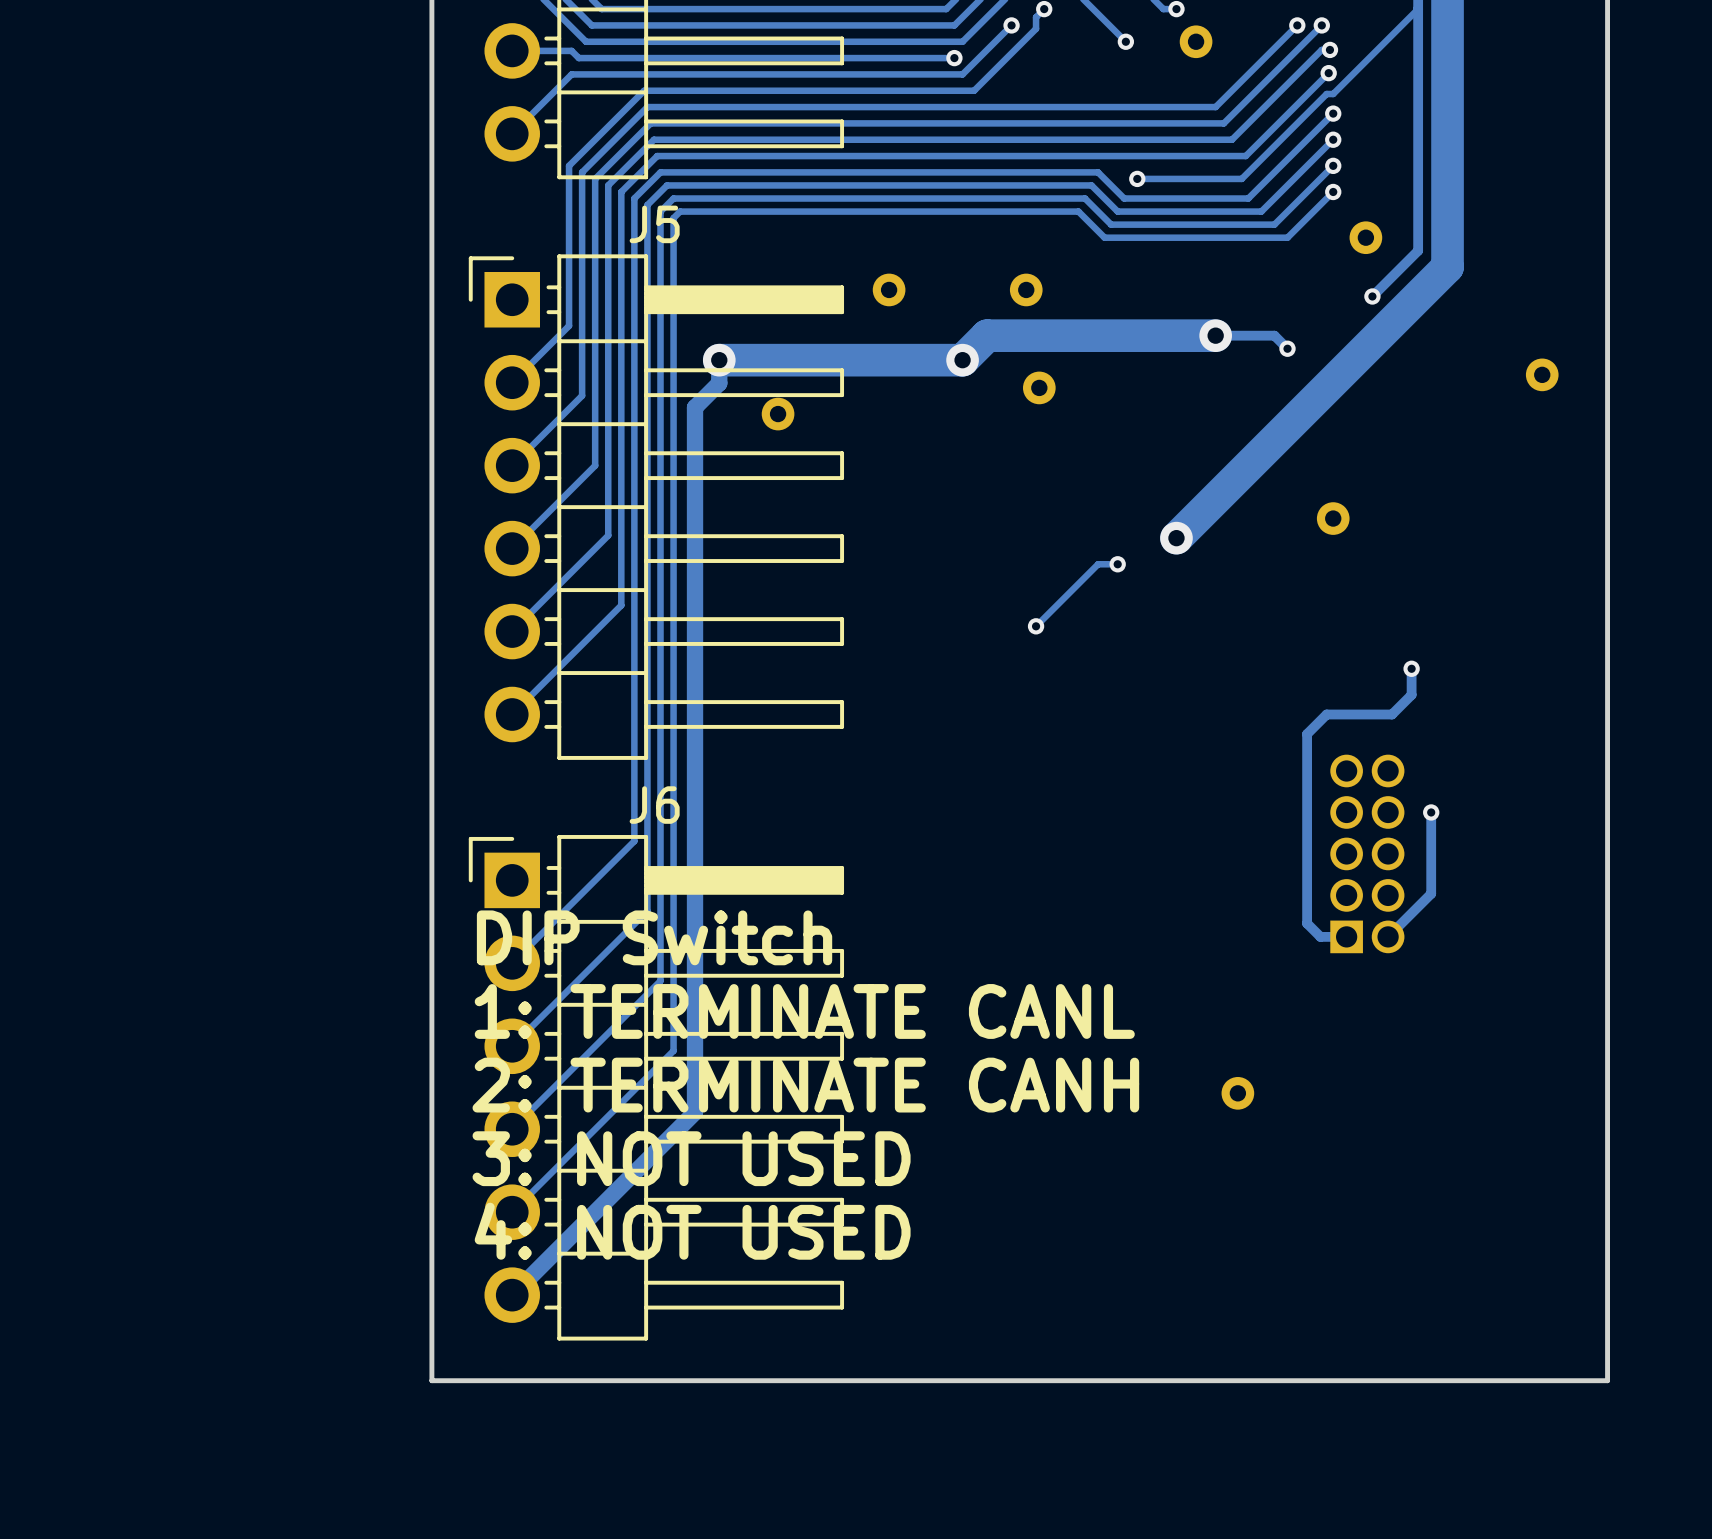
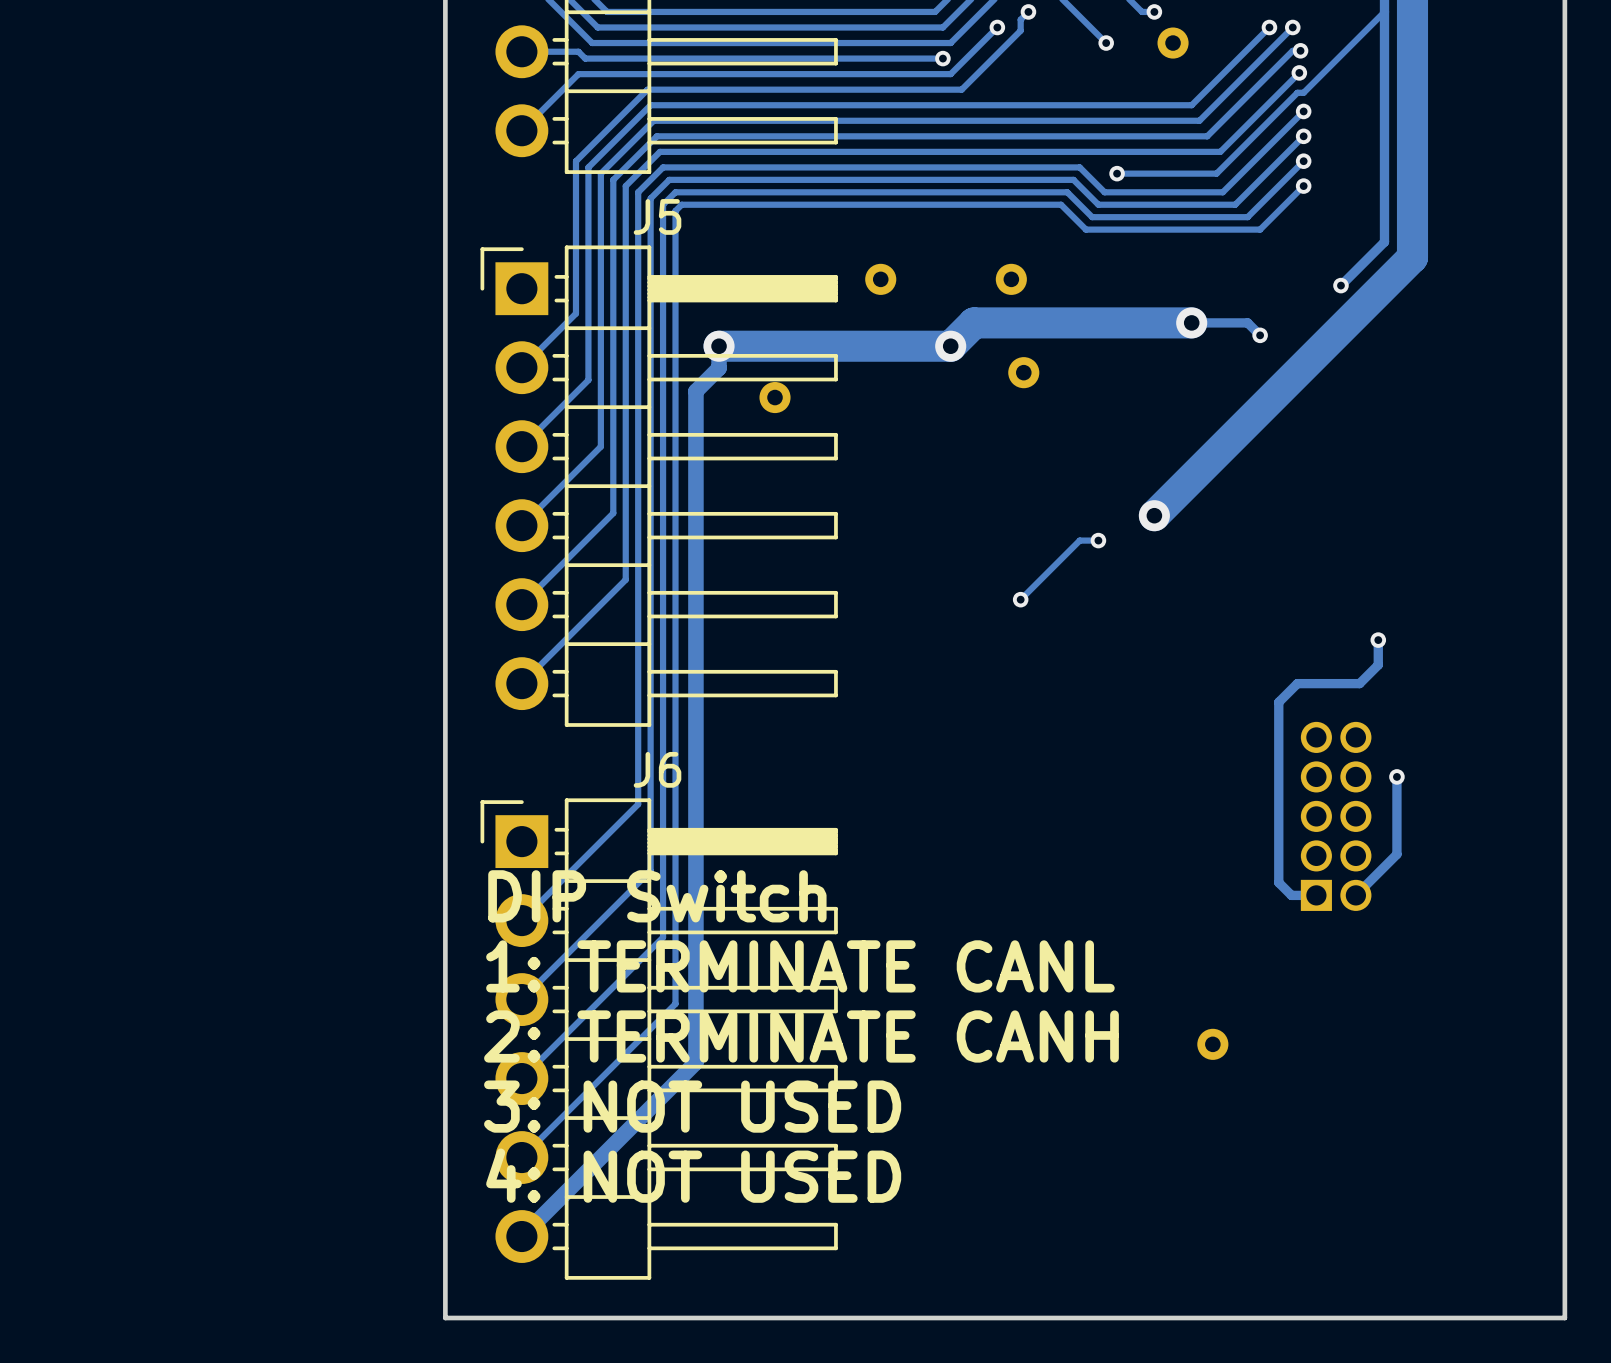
part: (1365, 237) -> none
part: (1542, 374) -> none
part: (1333, 518) -> none

